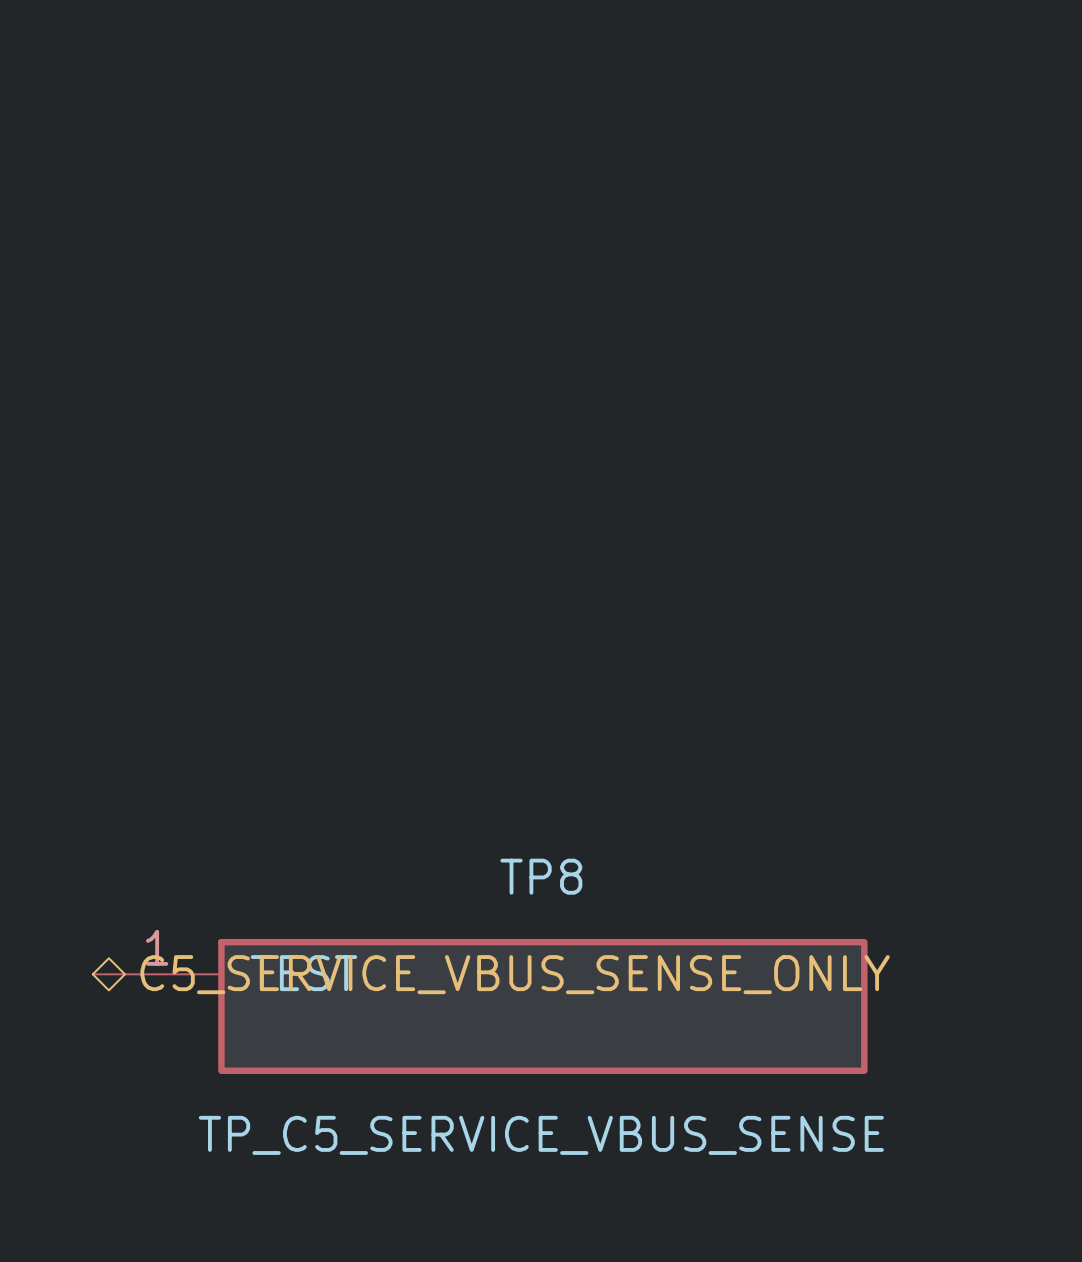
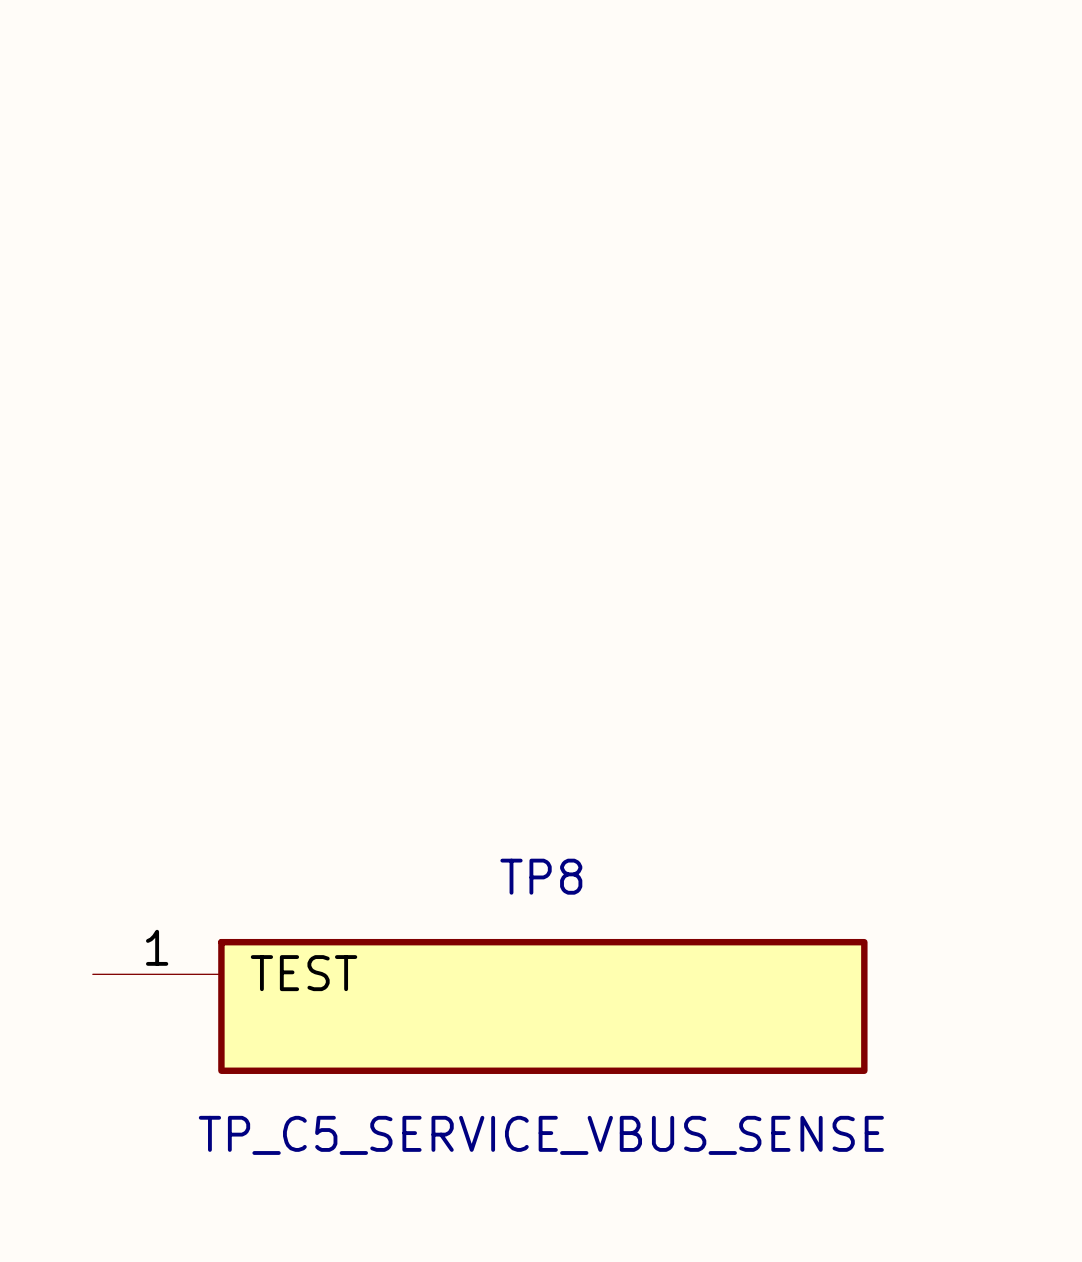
hierarchical label: C5_SERVICE_VBUS_SENSE_ONLY (515, 974) -> none

